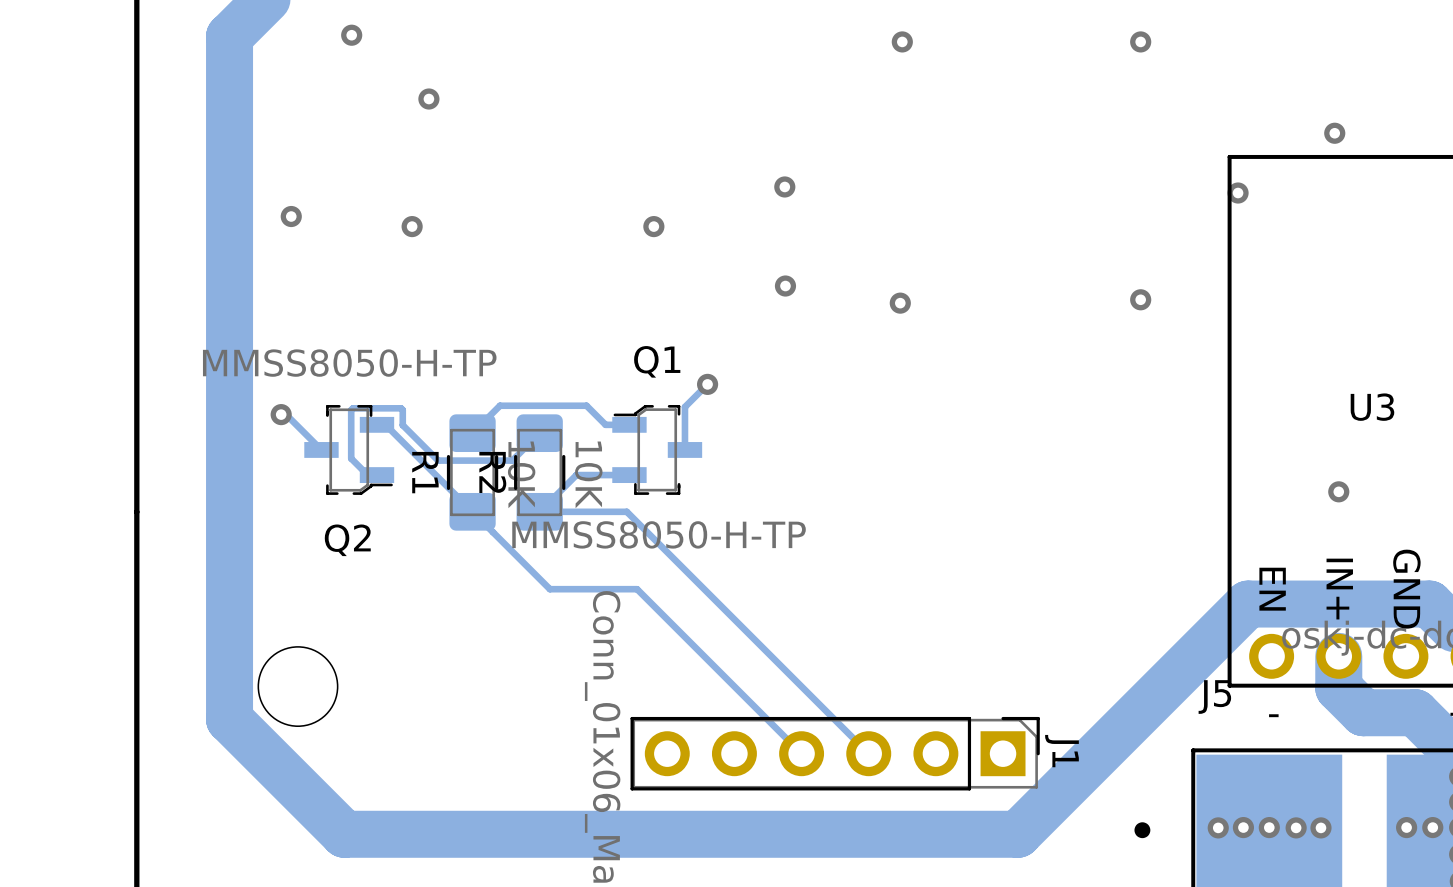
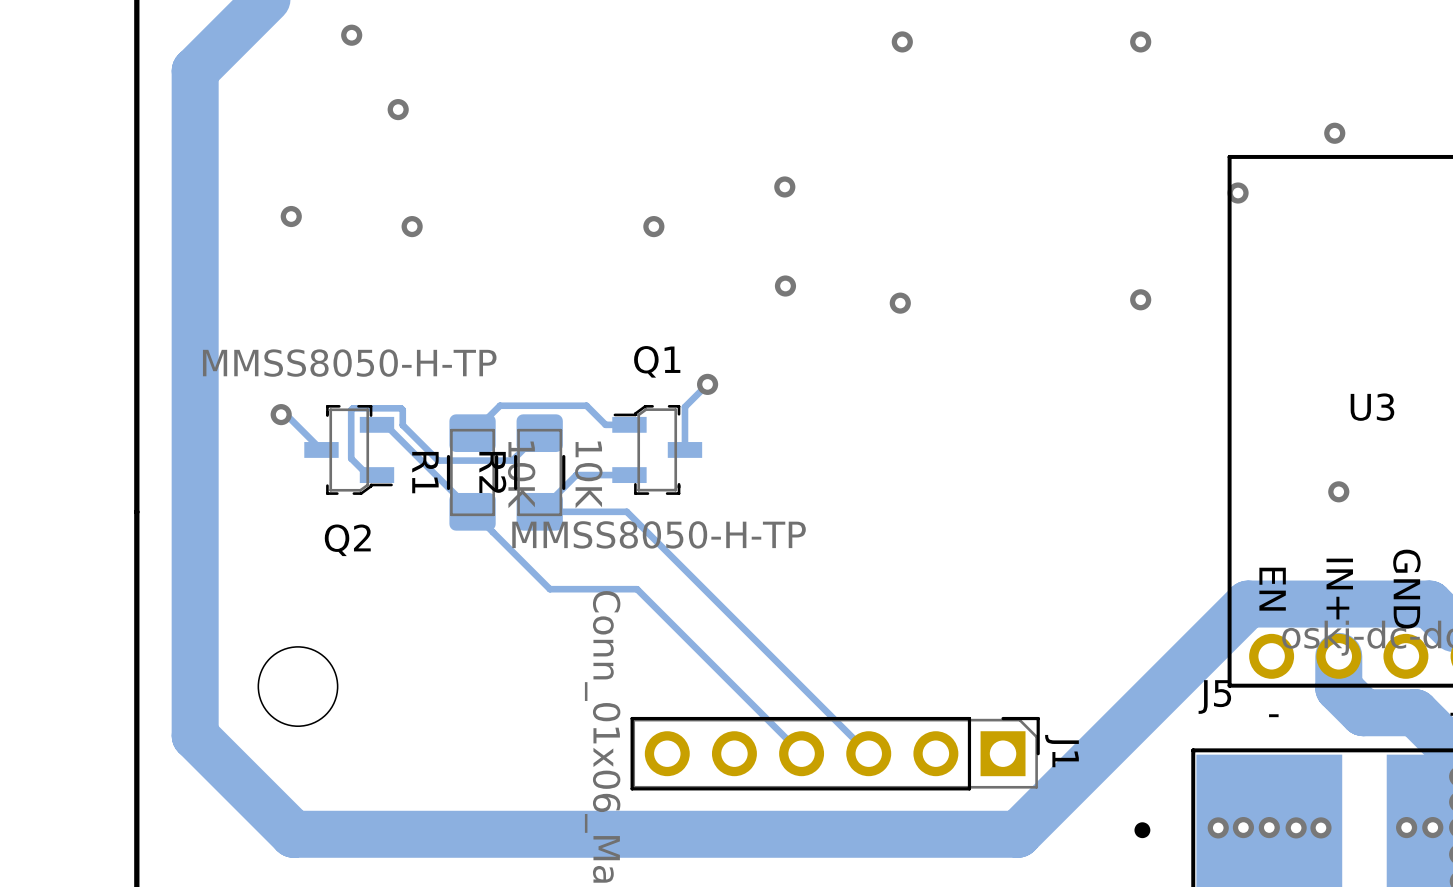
track: (229, 36) (229, 719) (344, 834) -> (229, 36) (195, 70) (195, 735) (293, 834) (344, 834)
via position: (428, 99) -> (398, 109)

